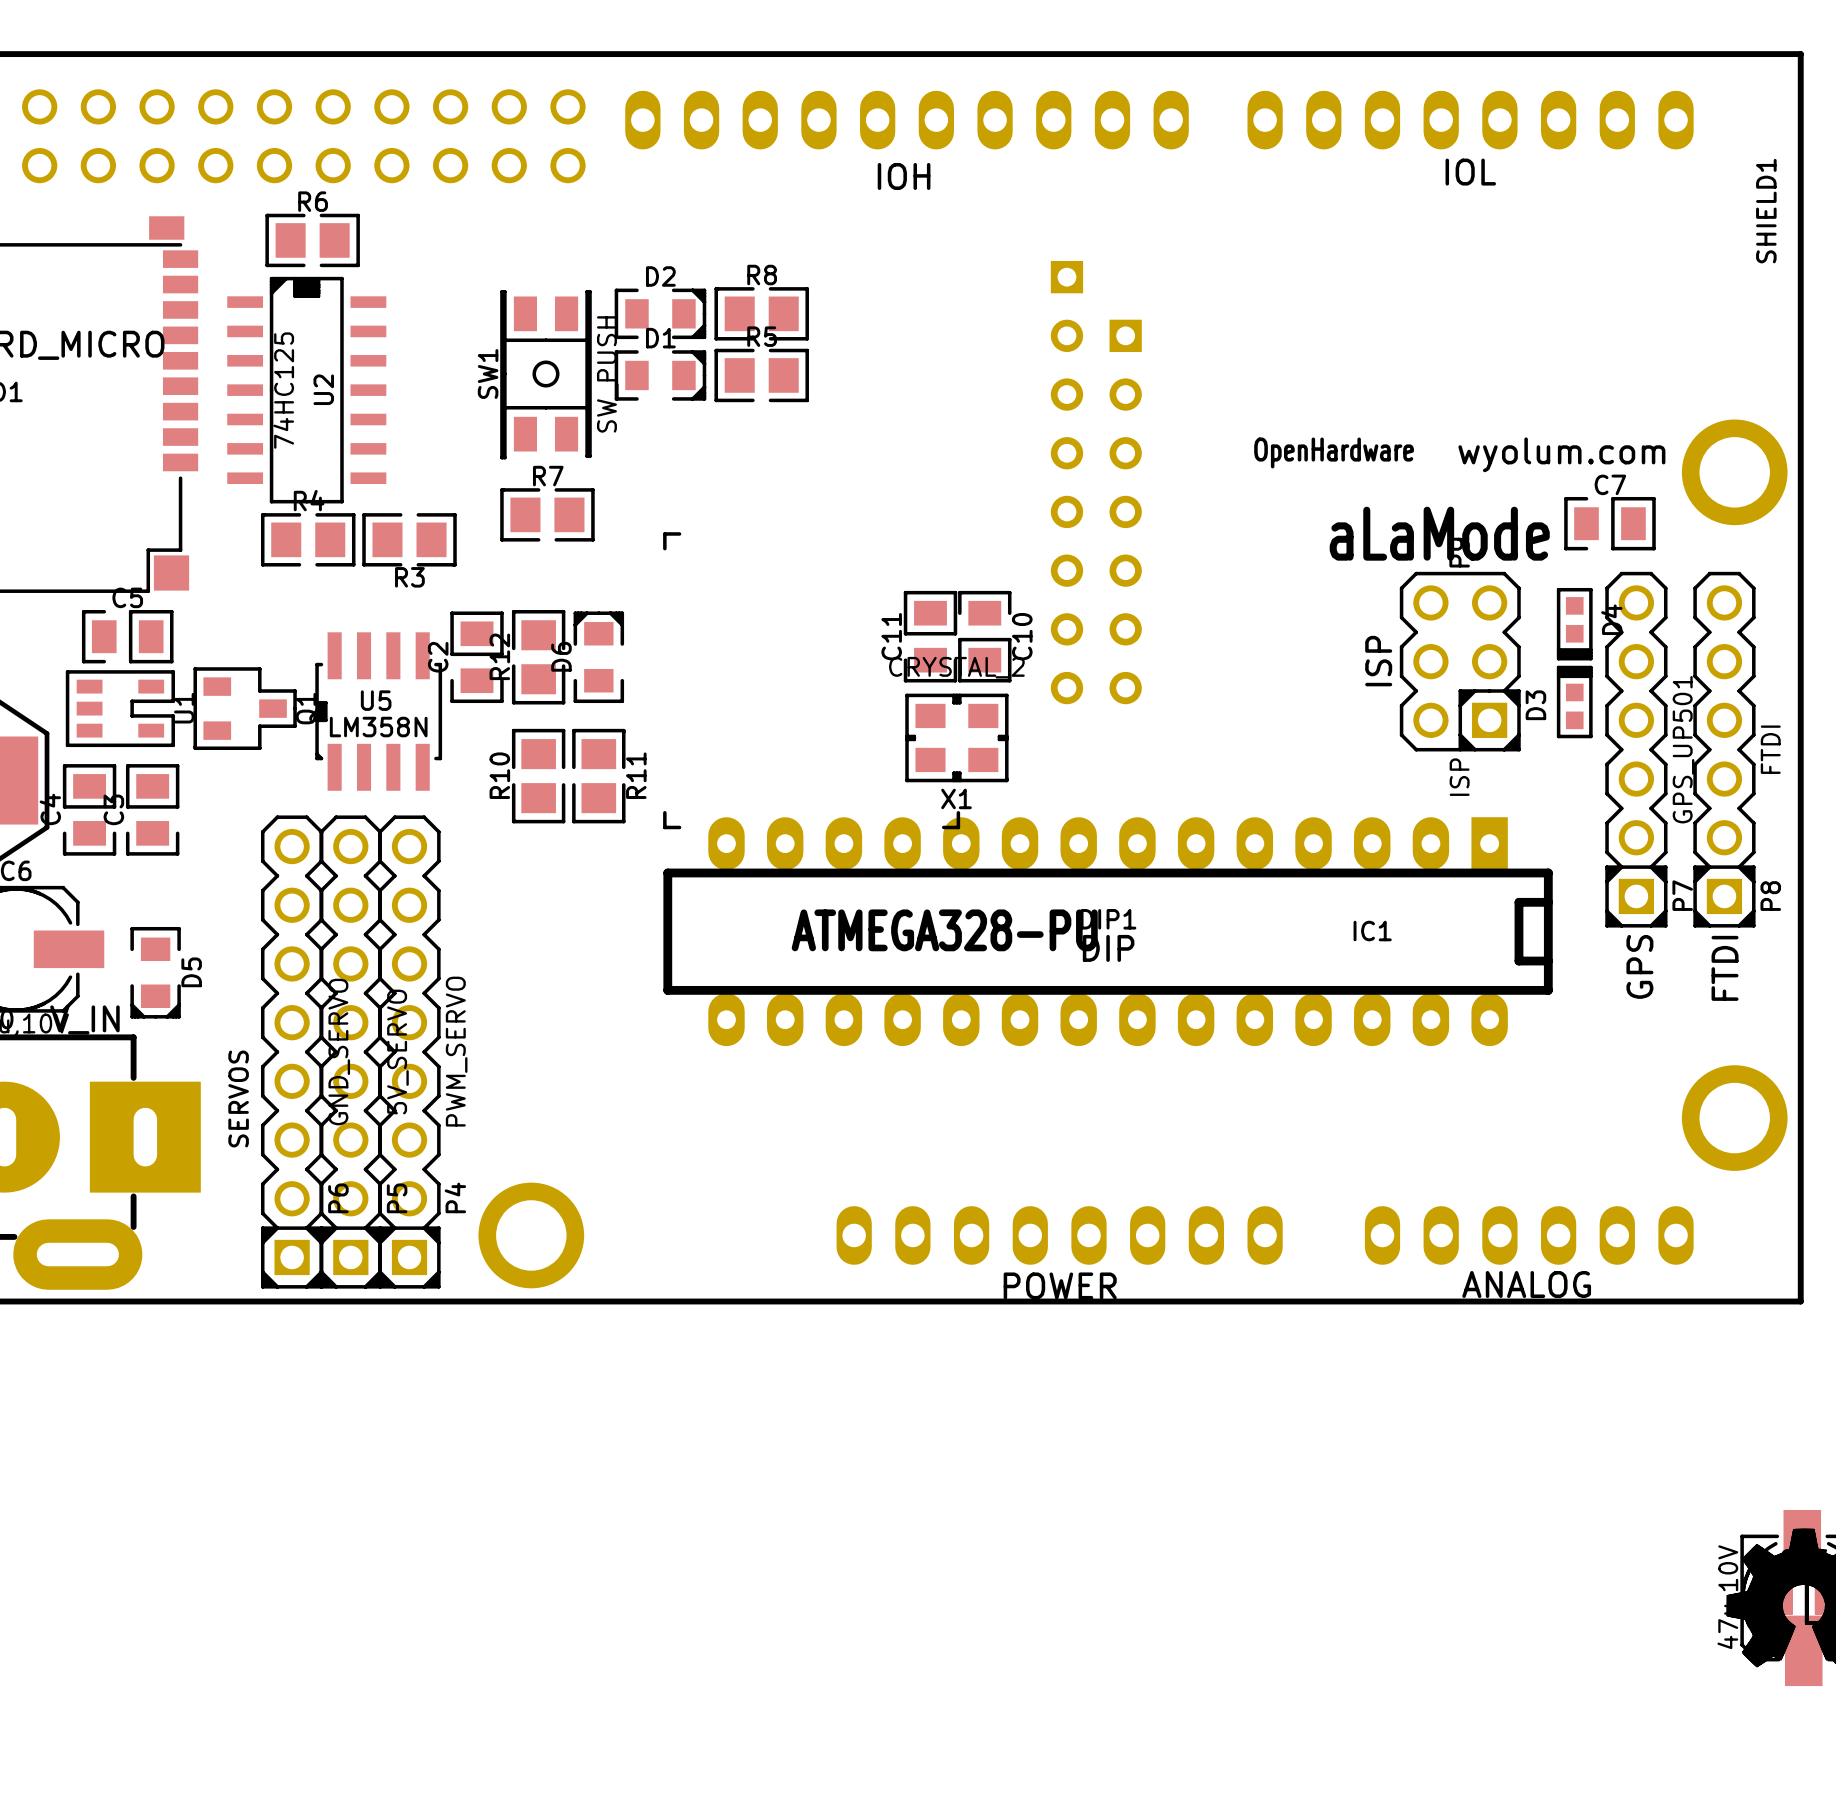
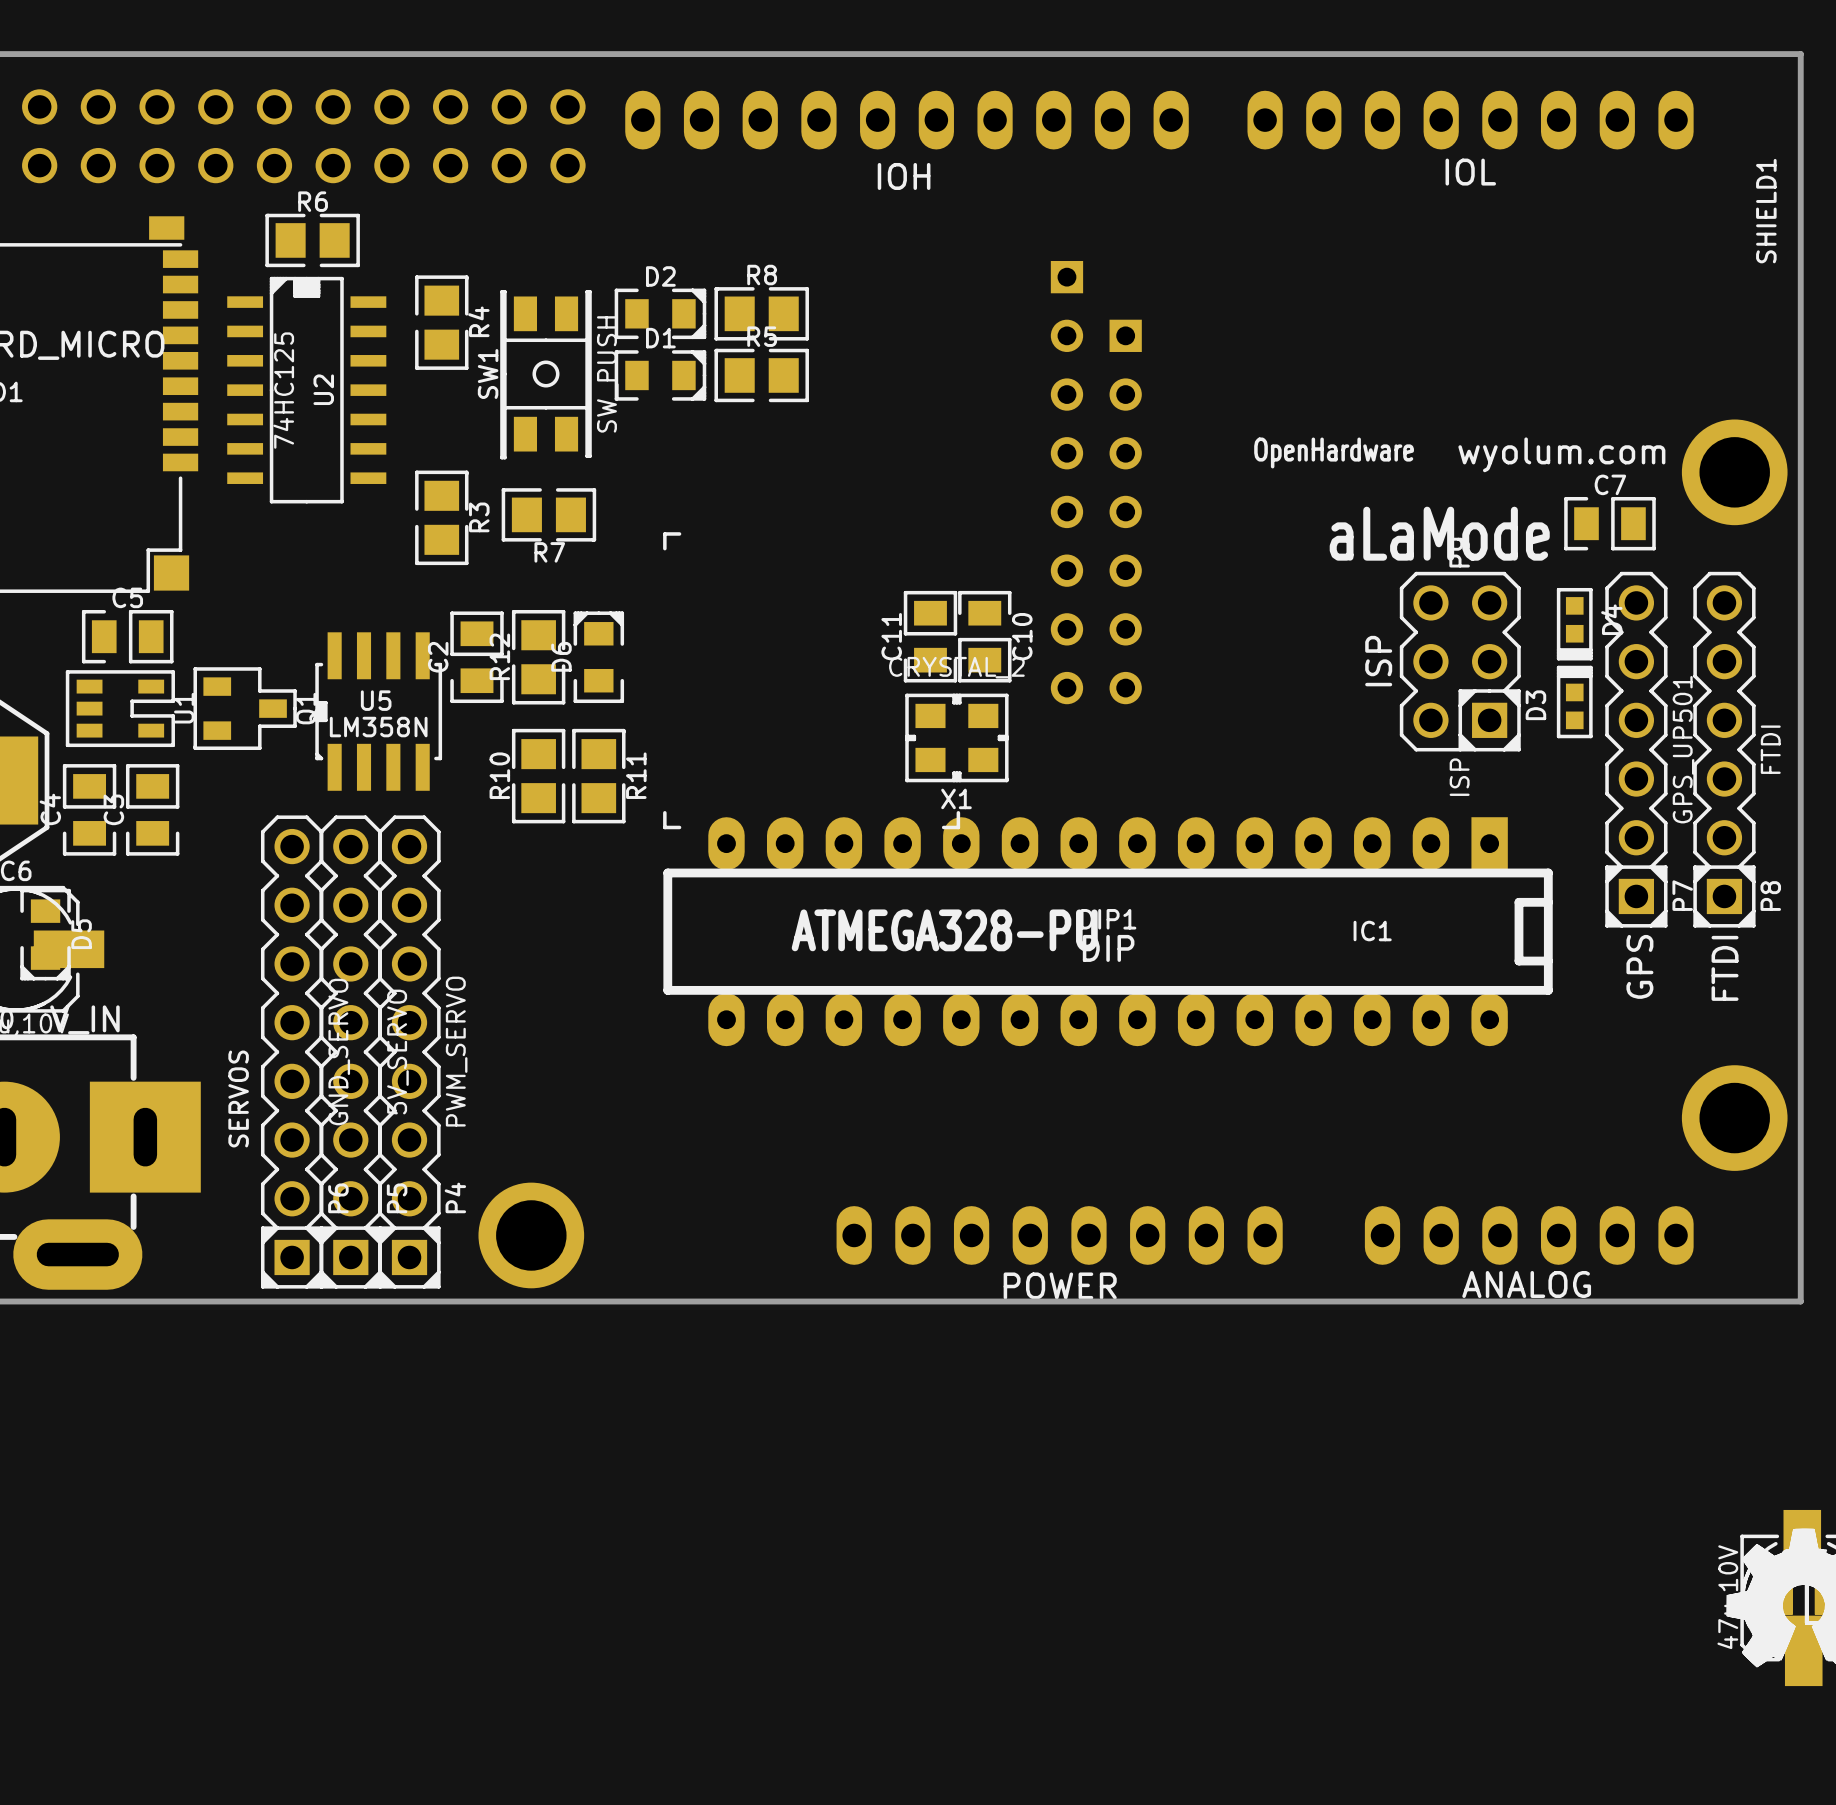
R7 rotation: 0° (547, 514) -> 180° (548, 514)
R4 rotation: 0° (308, 539) -> 90° clockwise (441, 322)
R4 position: (308, 539) -> (441, 322)
R3 rotation: 0° (409, 539) -> 90° counterclockwise (441, 517)
D5 position: (155, 972) -> (45, 934)

